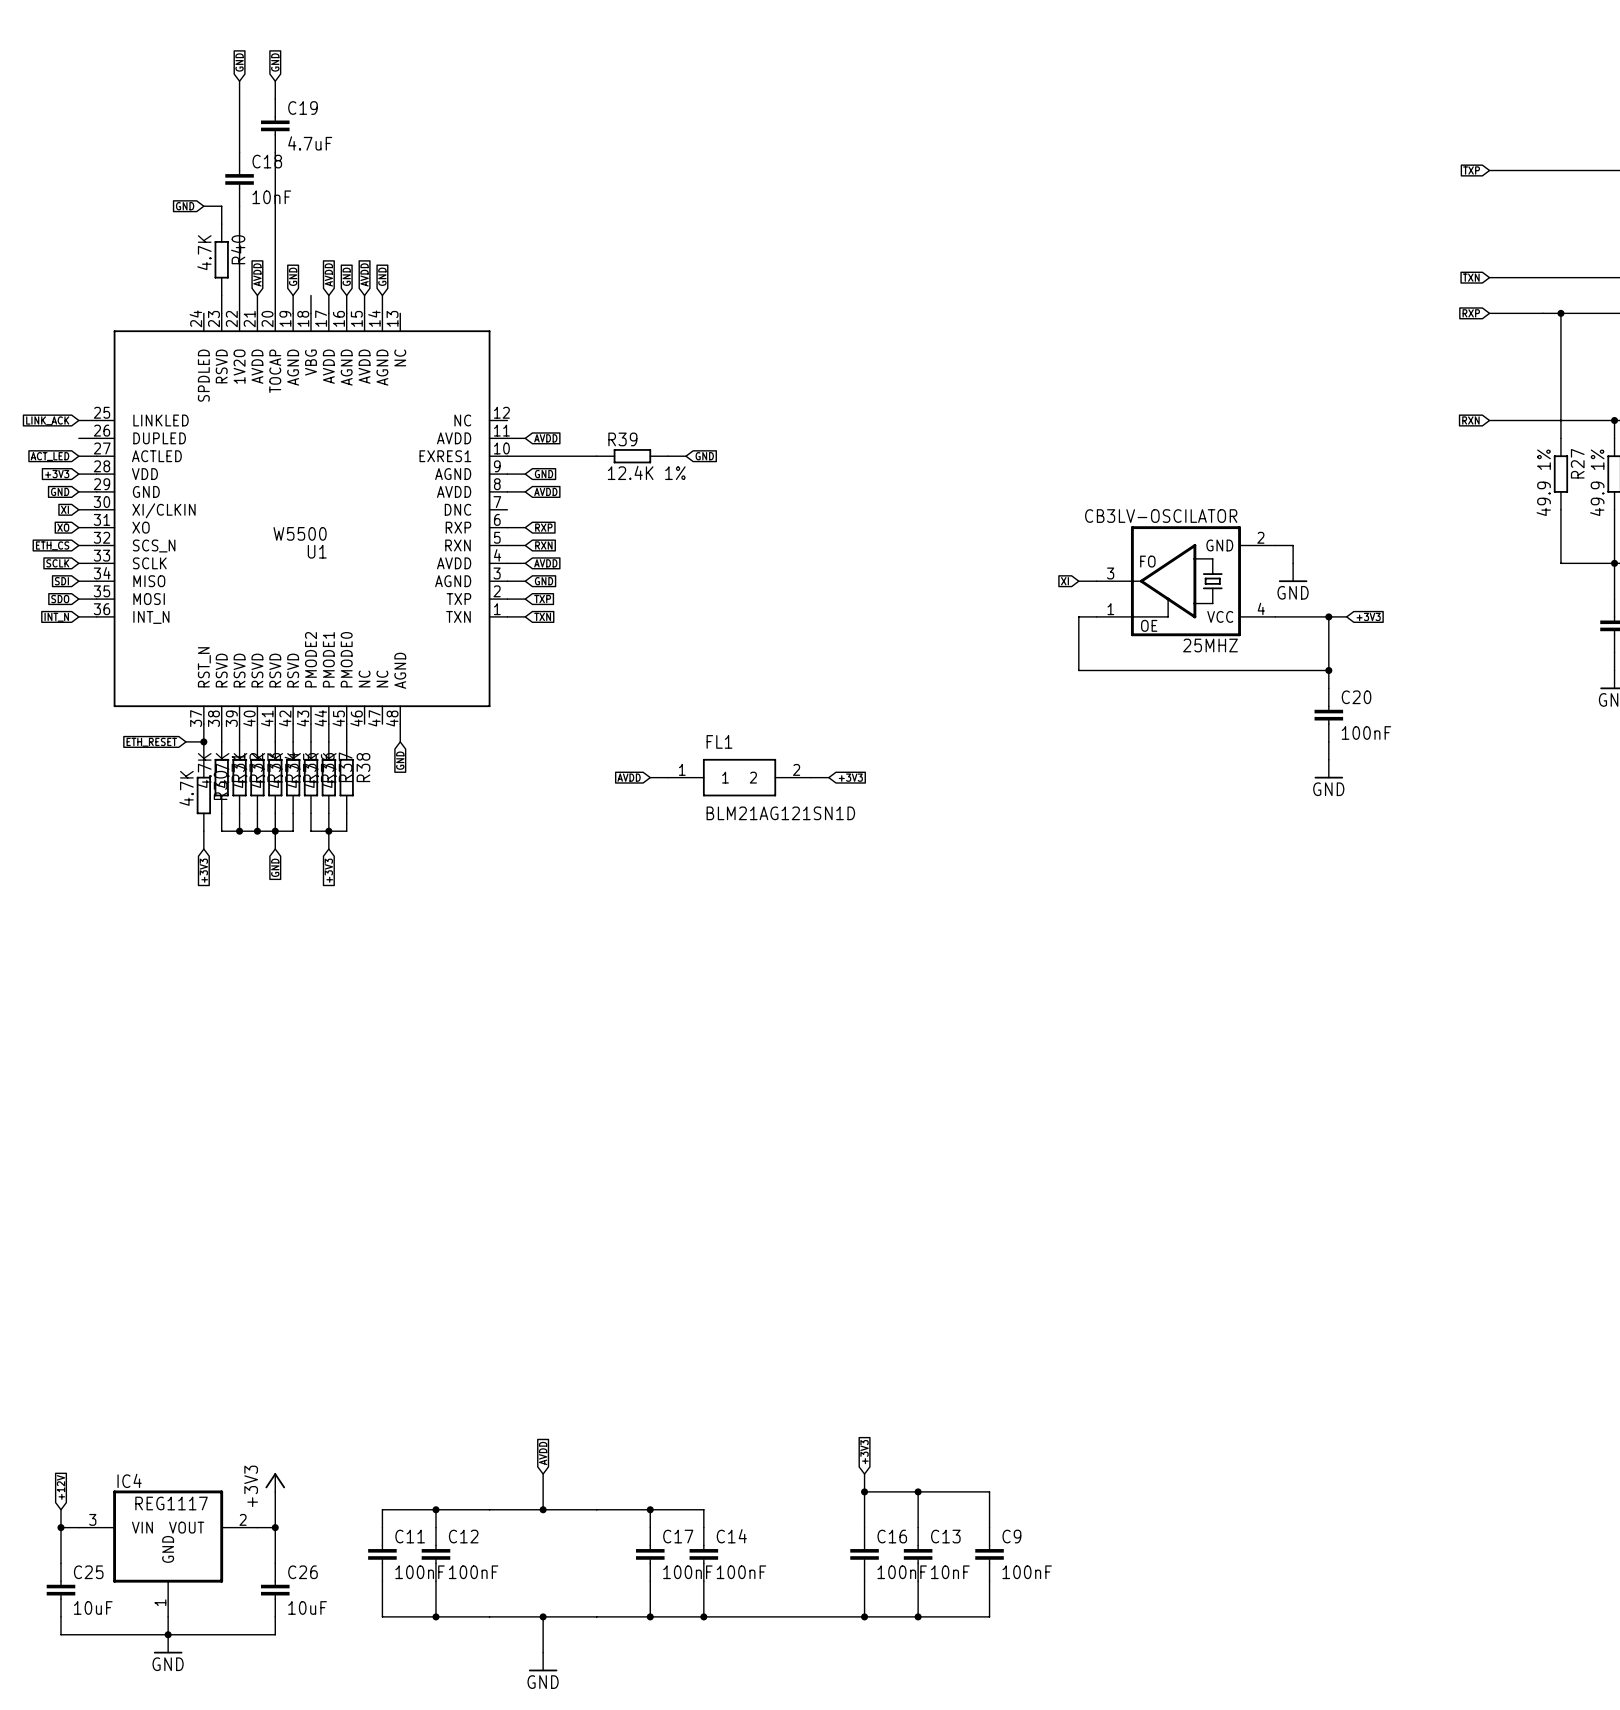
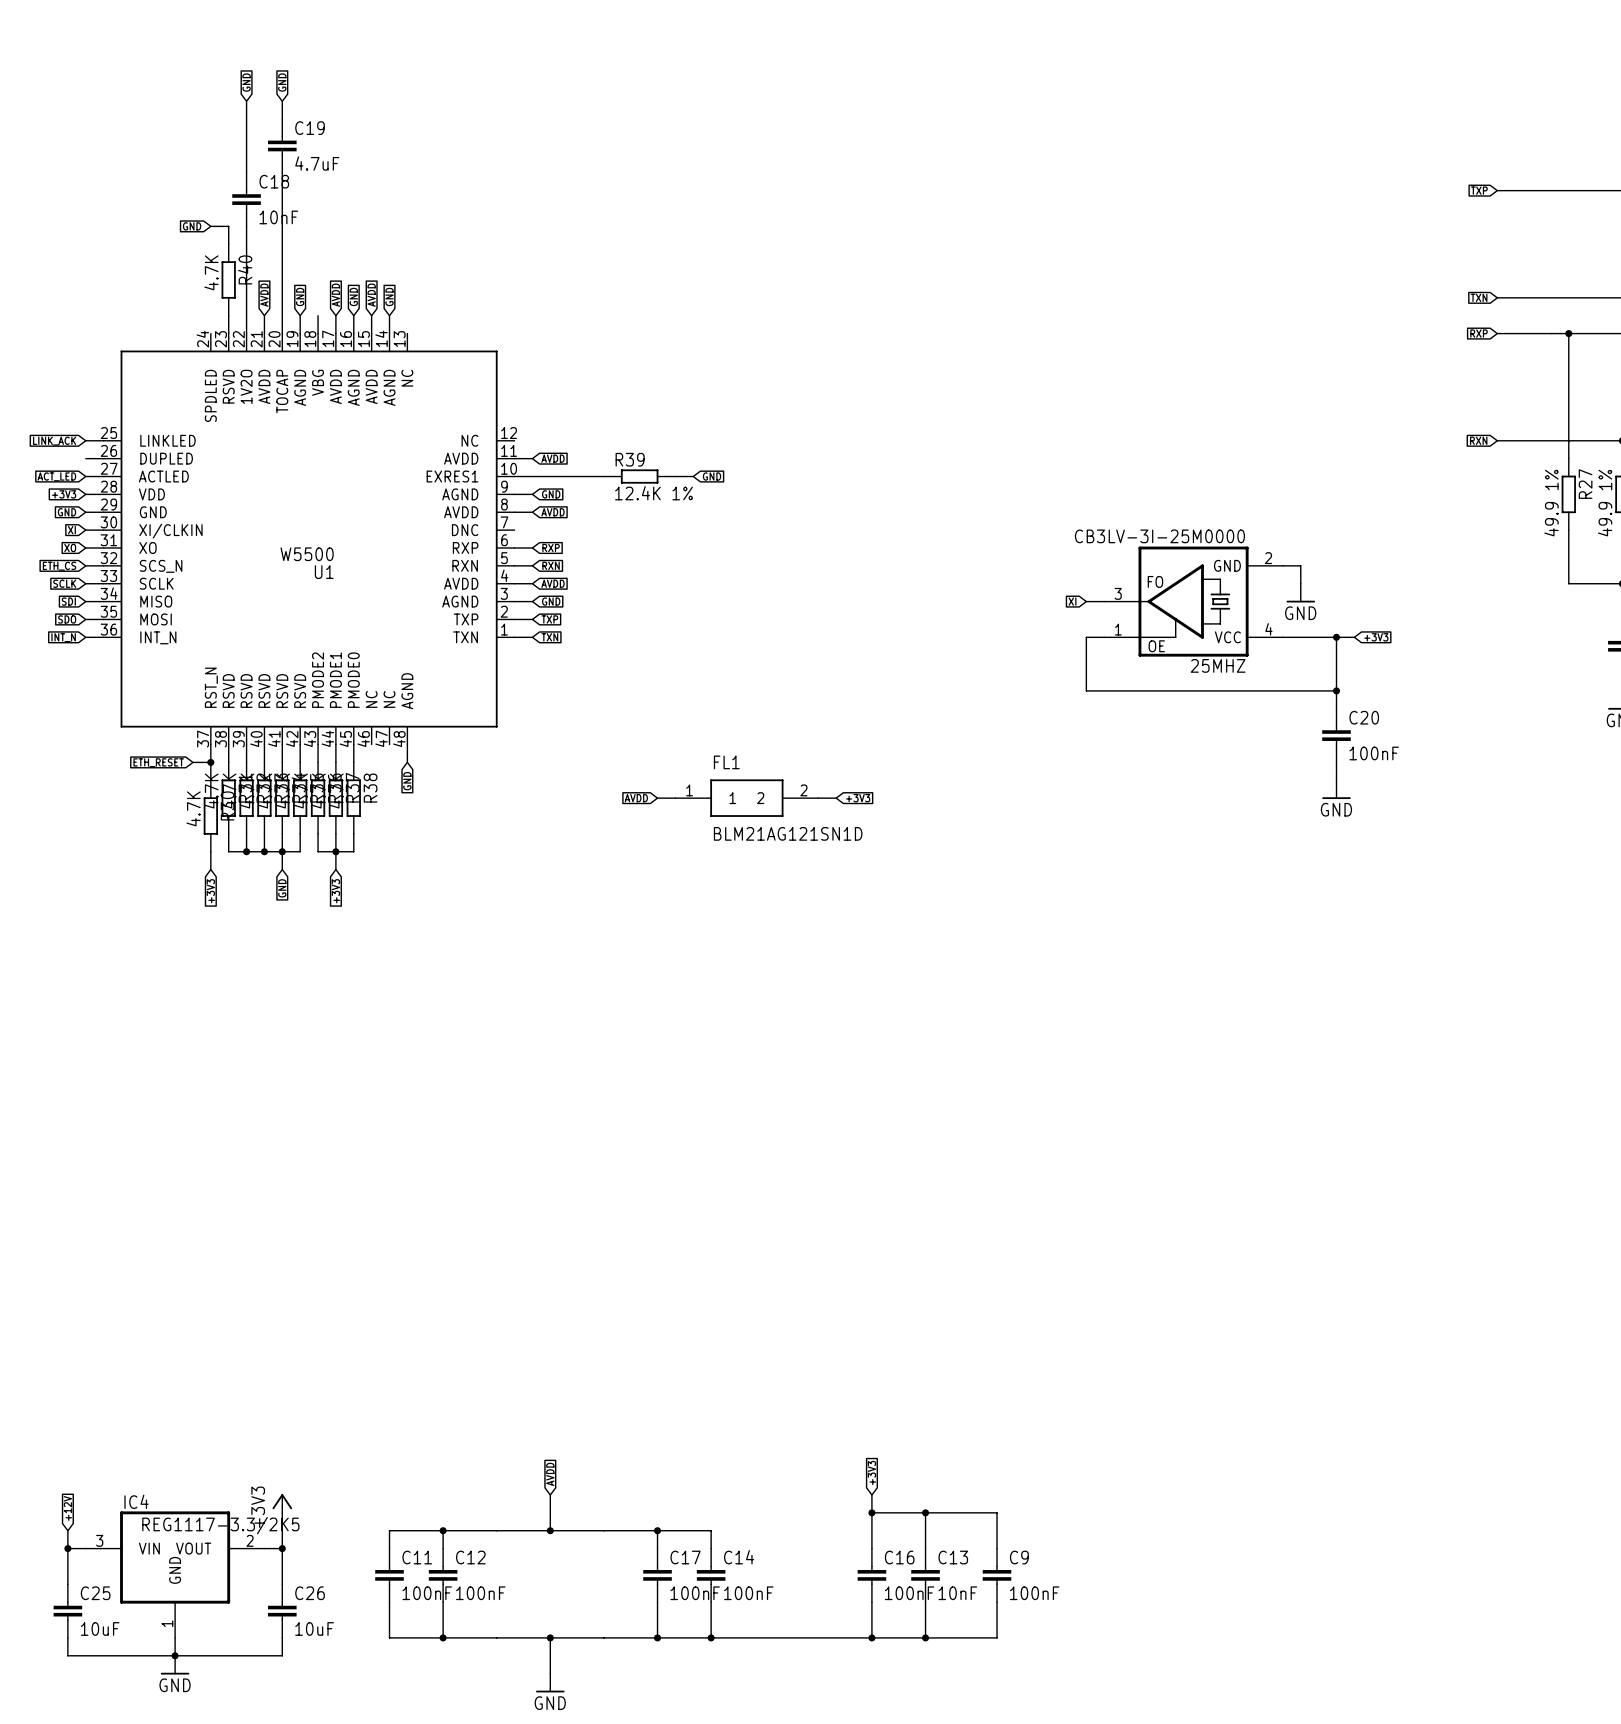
25MHZ value: CB3LV-OSCILATOR (1161, 516) -> CB3LV-3I-25M0000 (1159, 536)
IC4 value: REG1117 (171, 1503) -> REG1117-3.3/2K5 (220, 1525)

